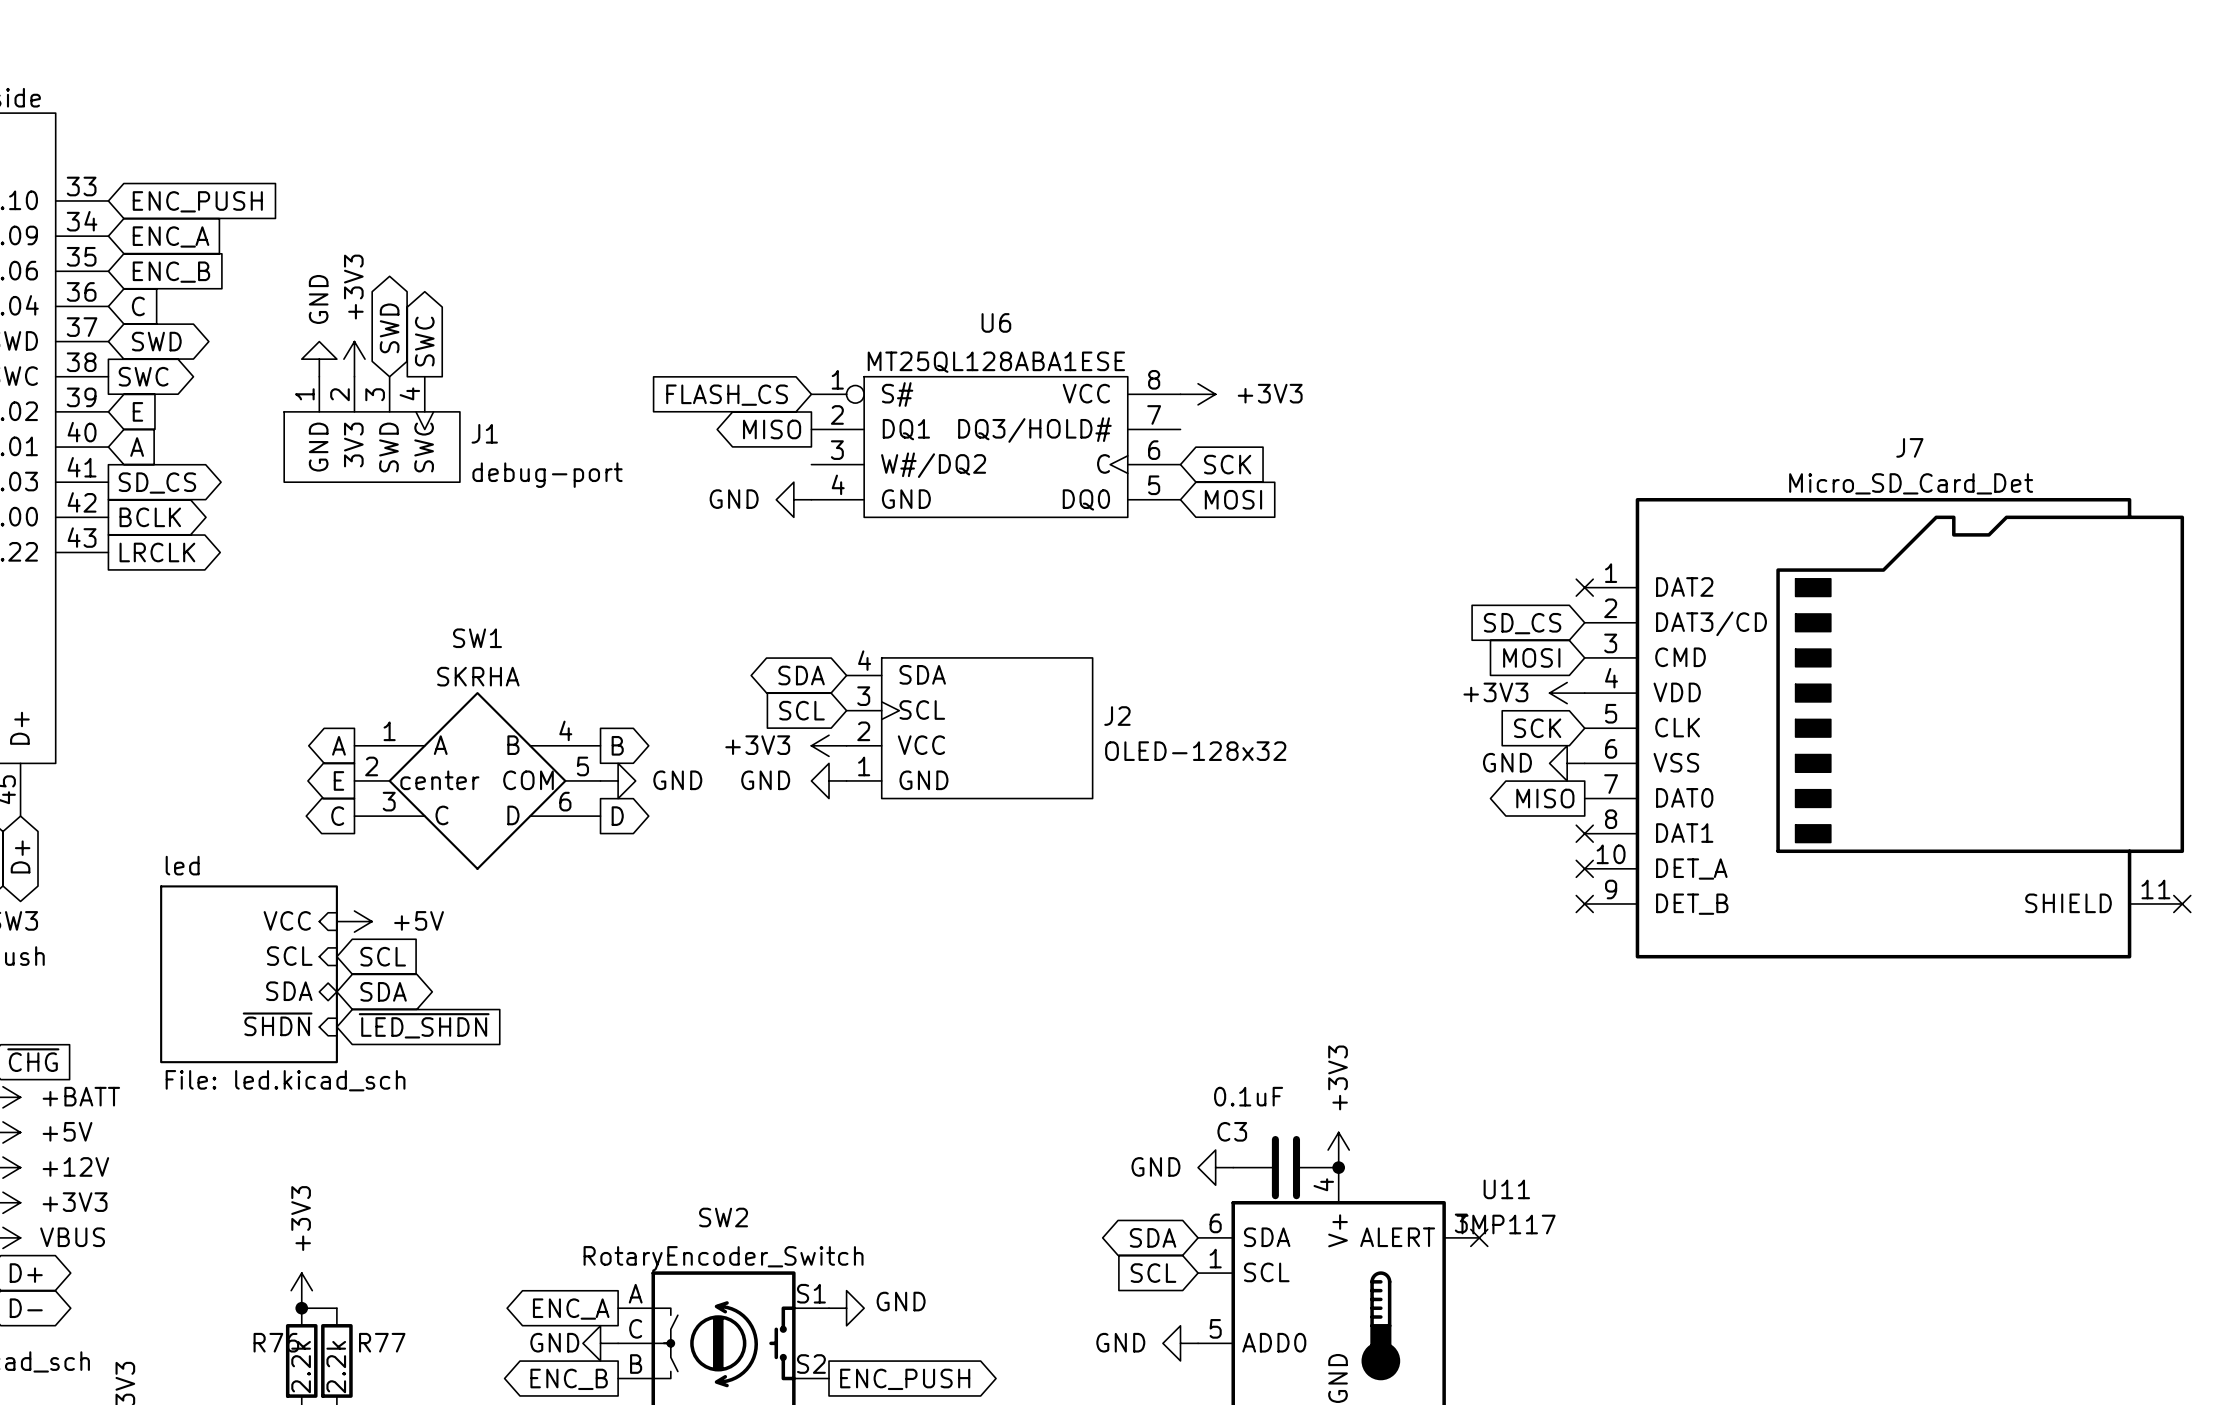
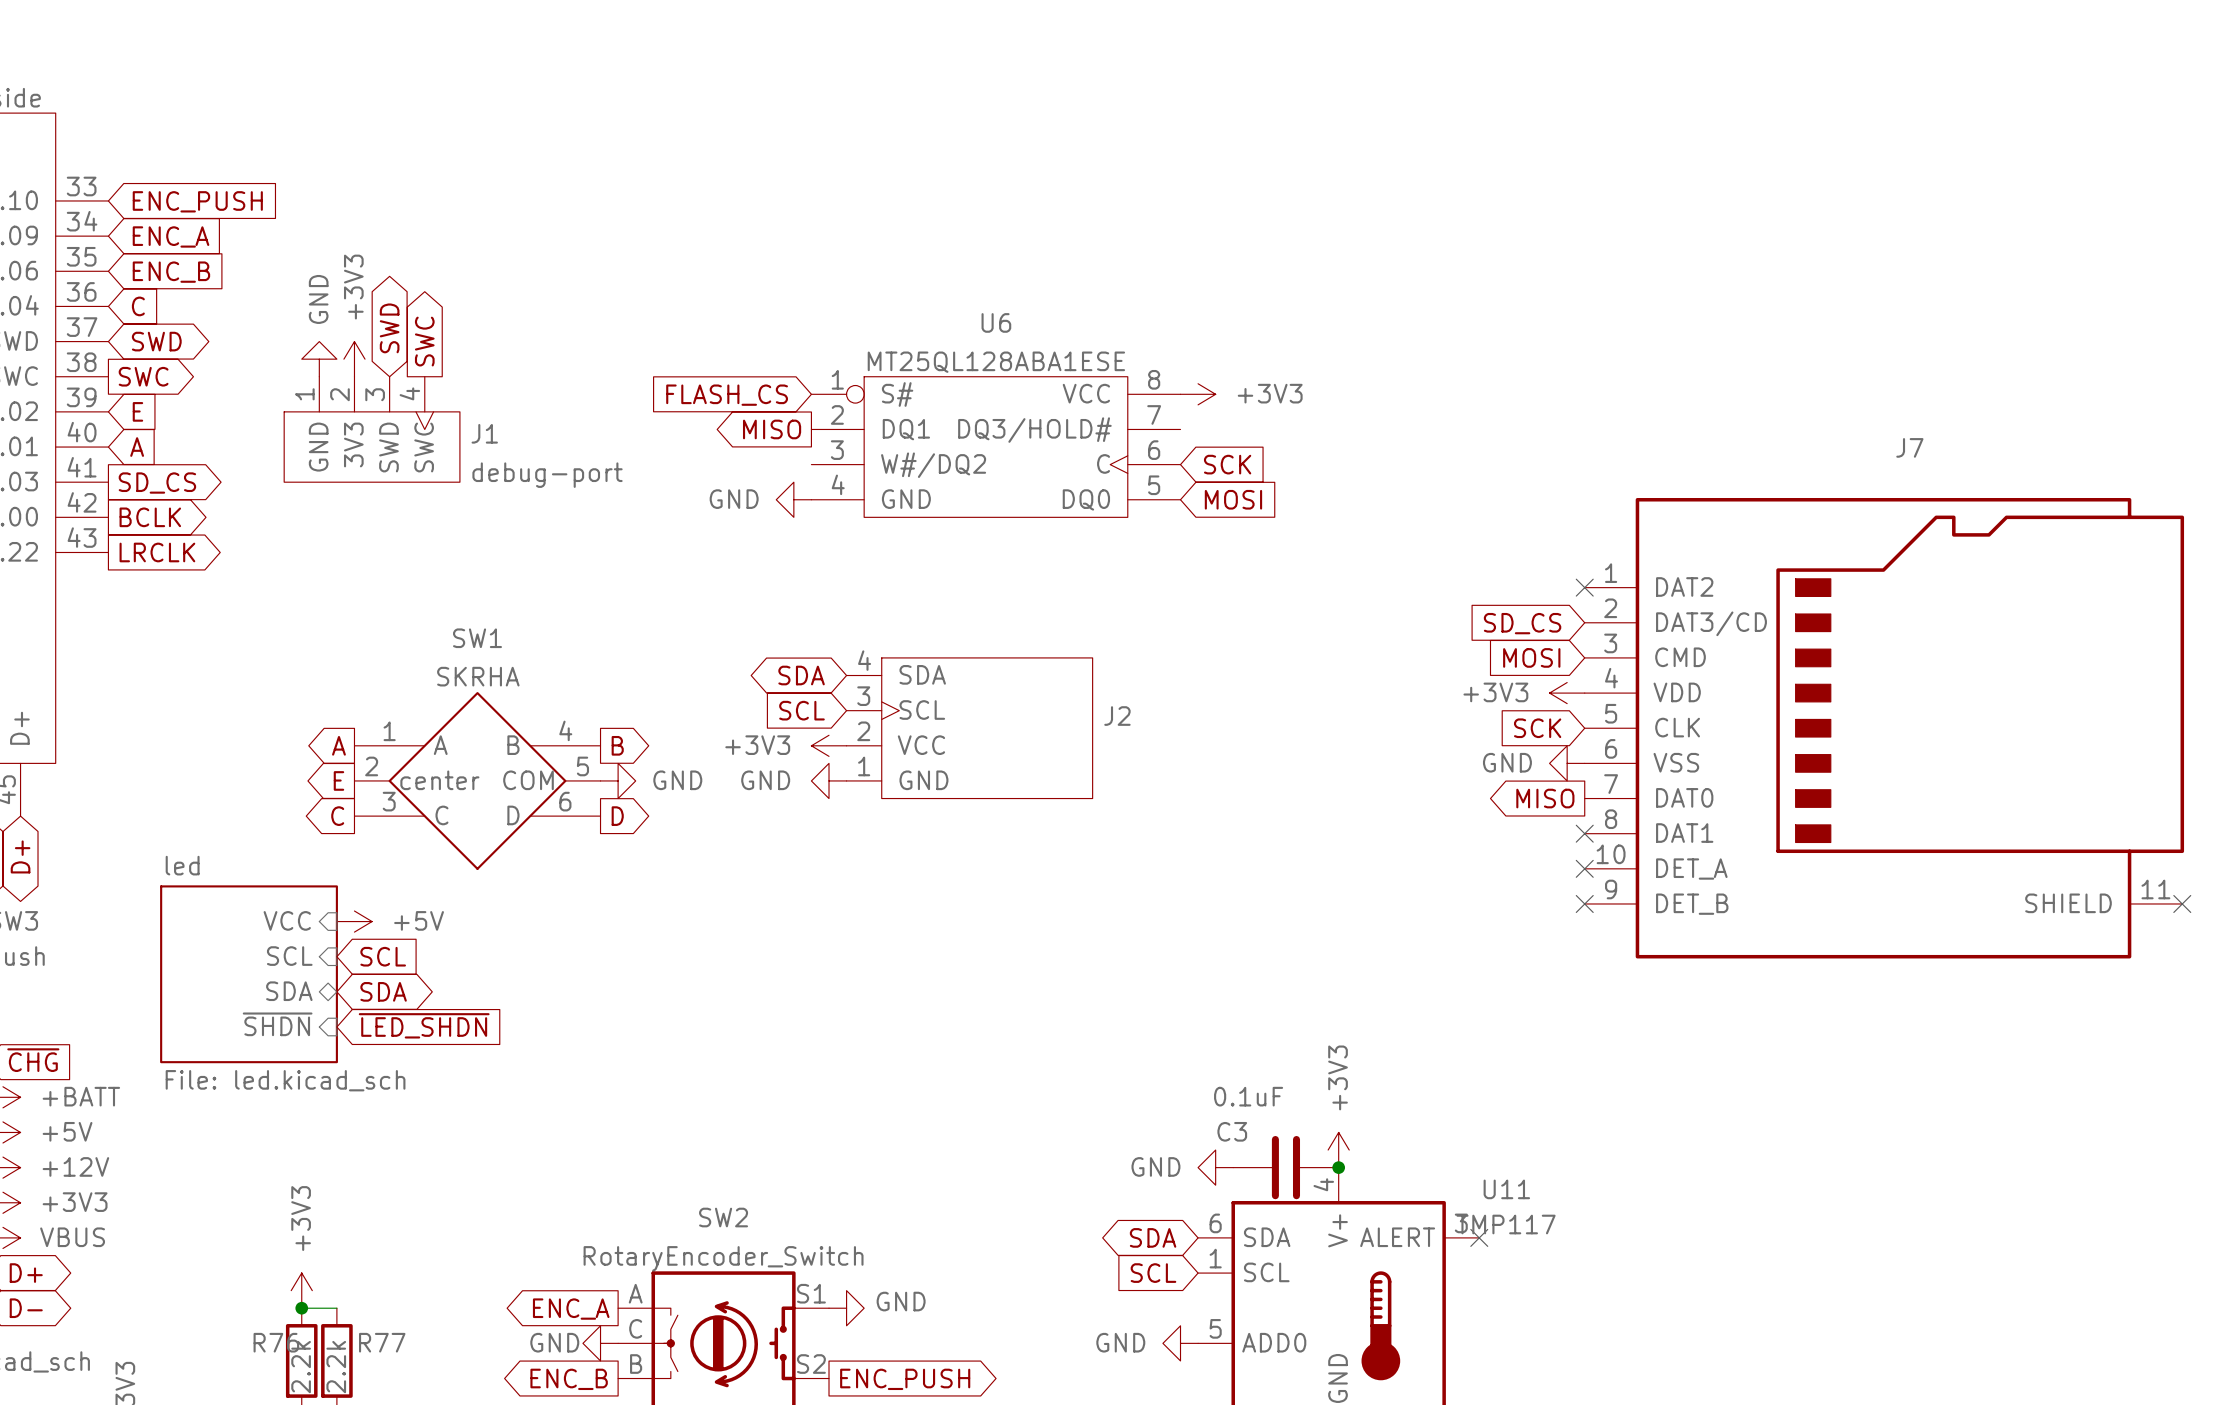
J7 value: Micro_SD_Card_Det (1911, 483) -> none
J2 value: OLED-128x32 (1195, 751) -> none

